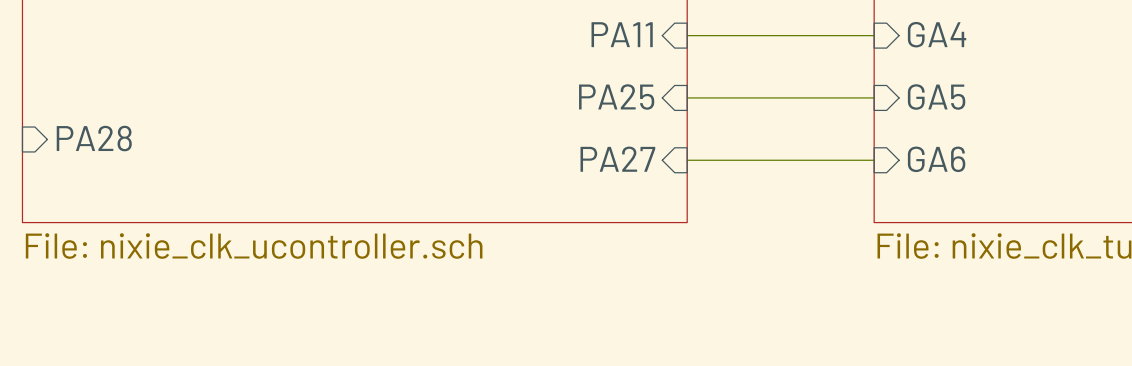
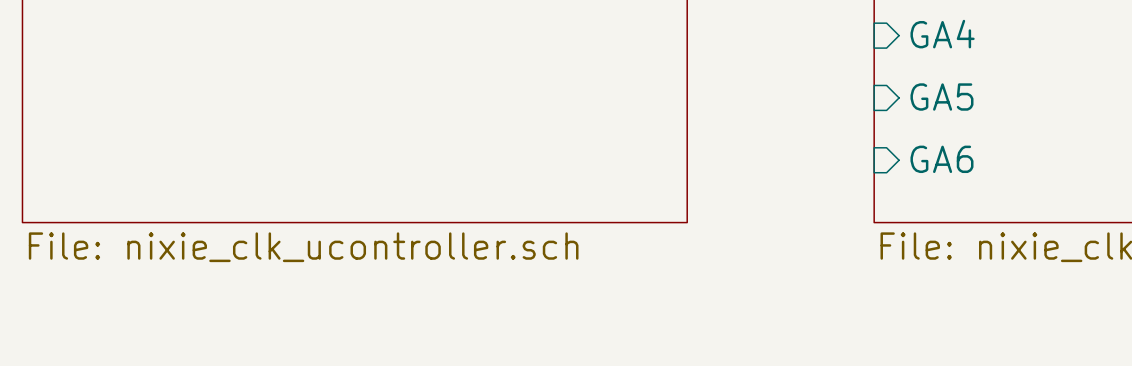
sheet pin: PA11 (622, 34) -> none
wire: (687, 35) (874, 35) -> none
sheet pin: PA25 (616, 96) -> none
wire: (687, 97) (874, 97) -> none
sheet pin: PA28 (94, 138) -> none
sheet pin: PA27 (617, 159) -> none
wire: (687, 160) (874, 160) -> none

